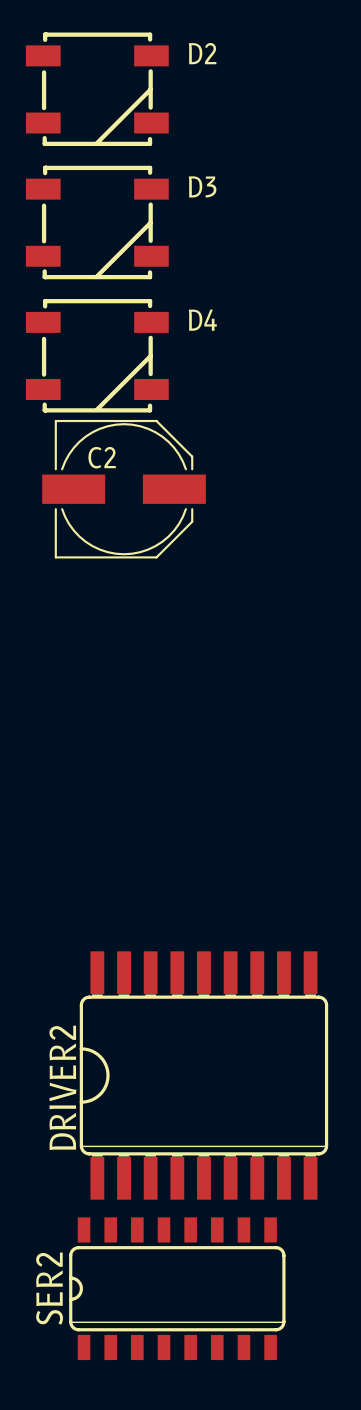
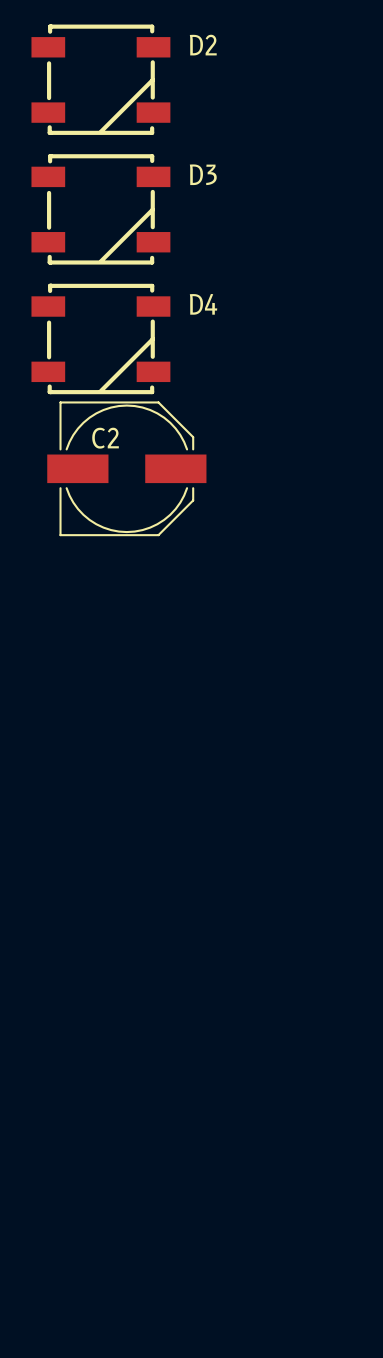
DRIVER2: (203, 1075) -> none
SER2: (177, 1288) -> none

